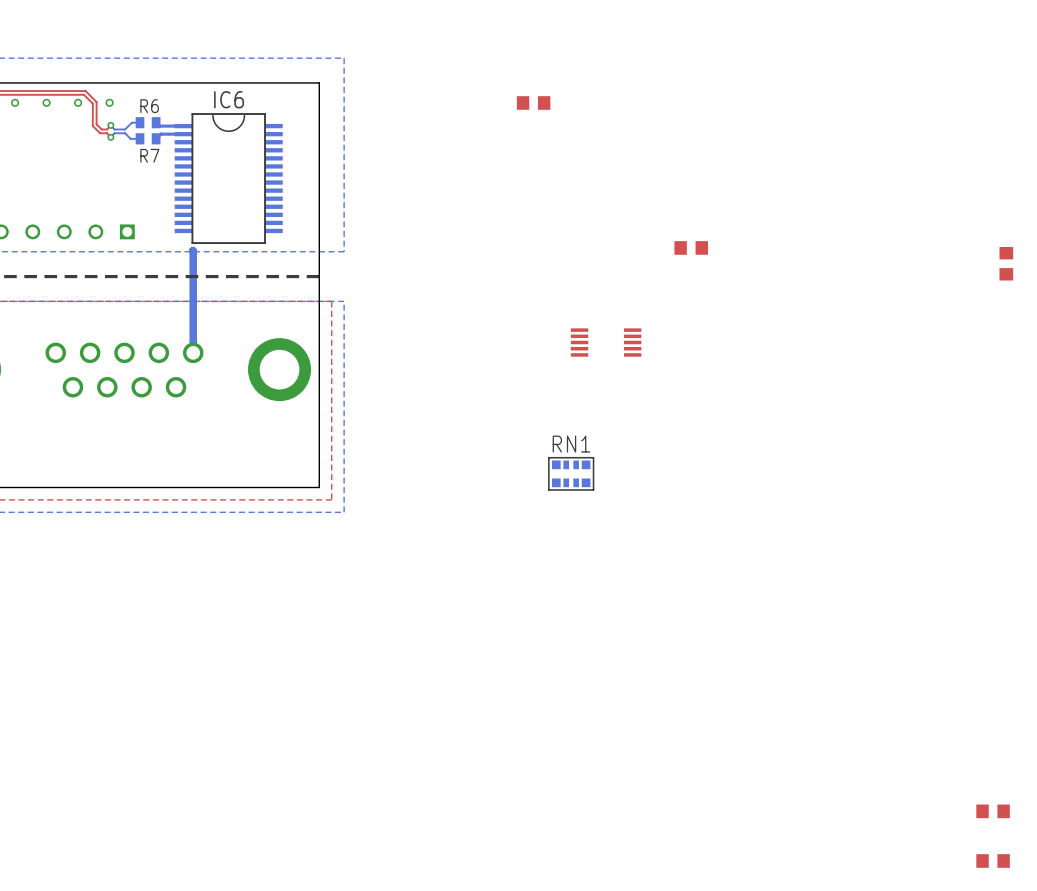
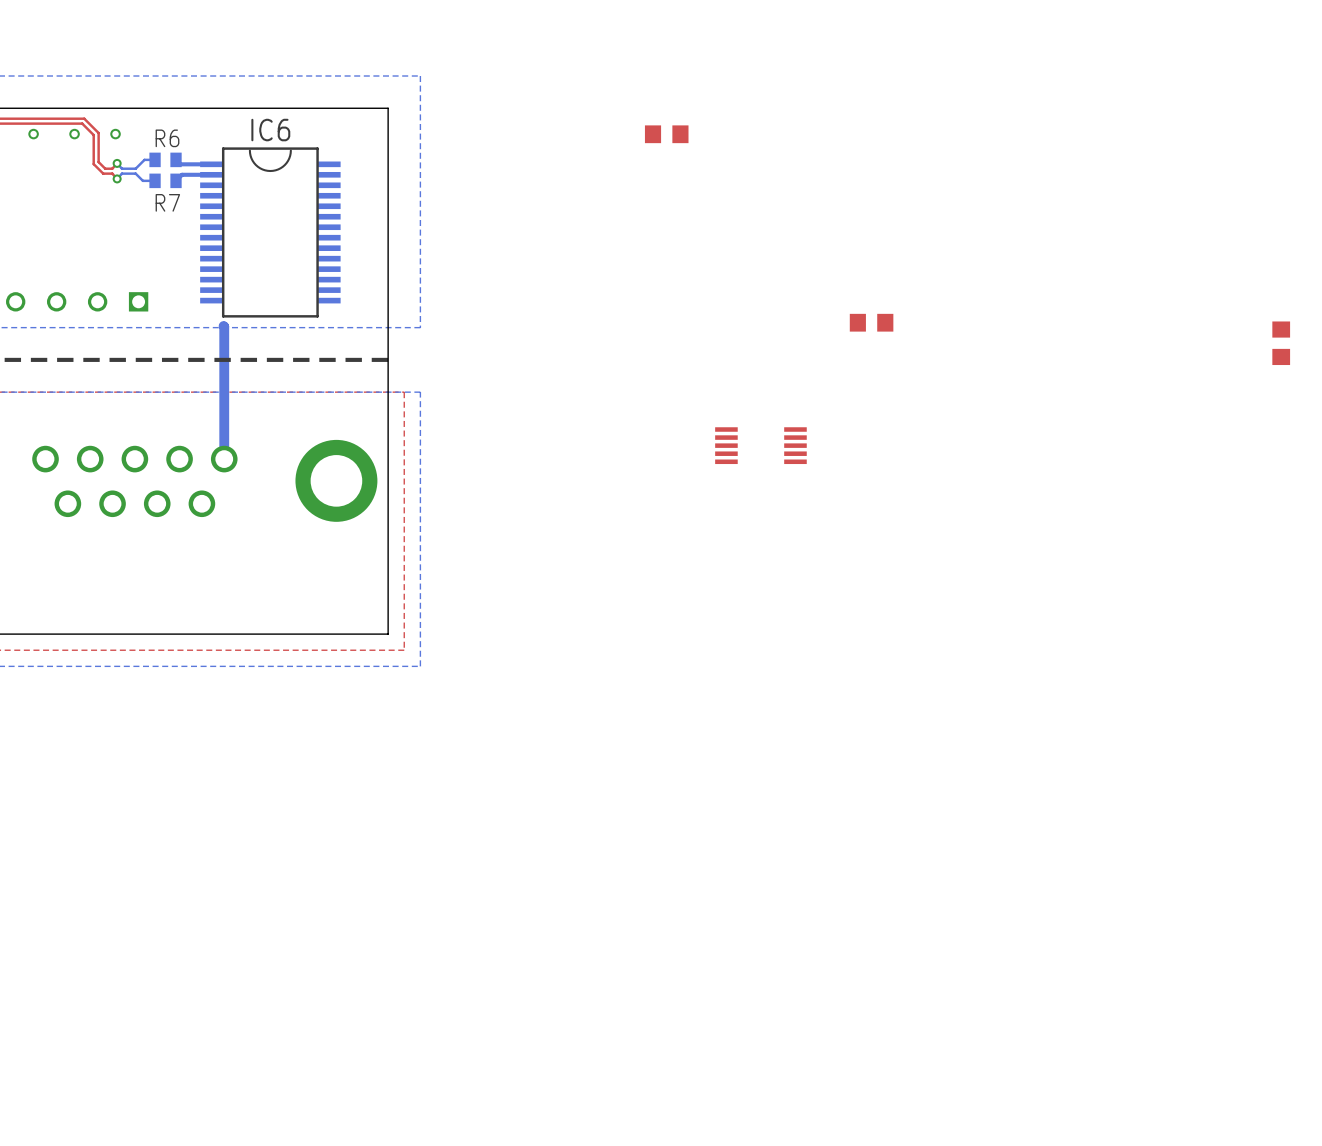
RN1: (571, 473) -> none
part: (993, 811) -> none
part: (993, 860) -> none

